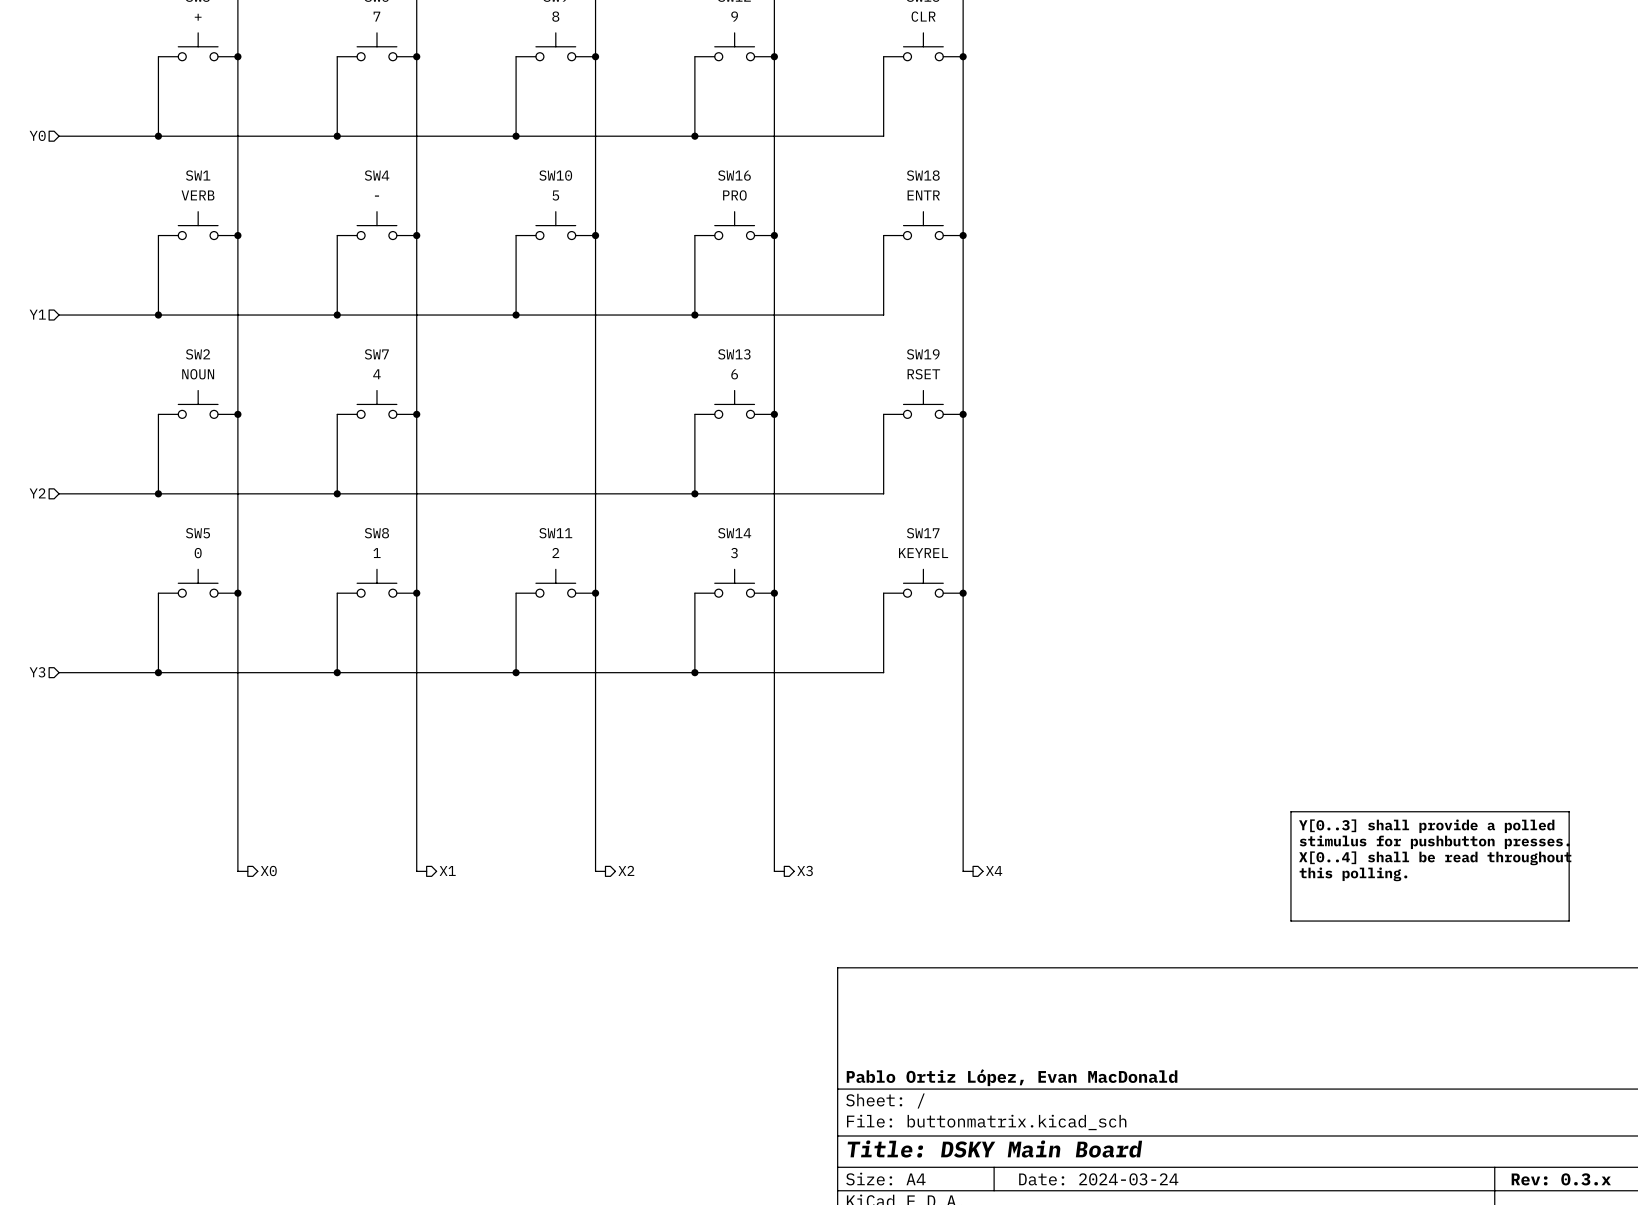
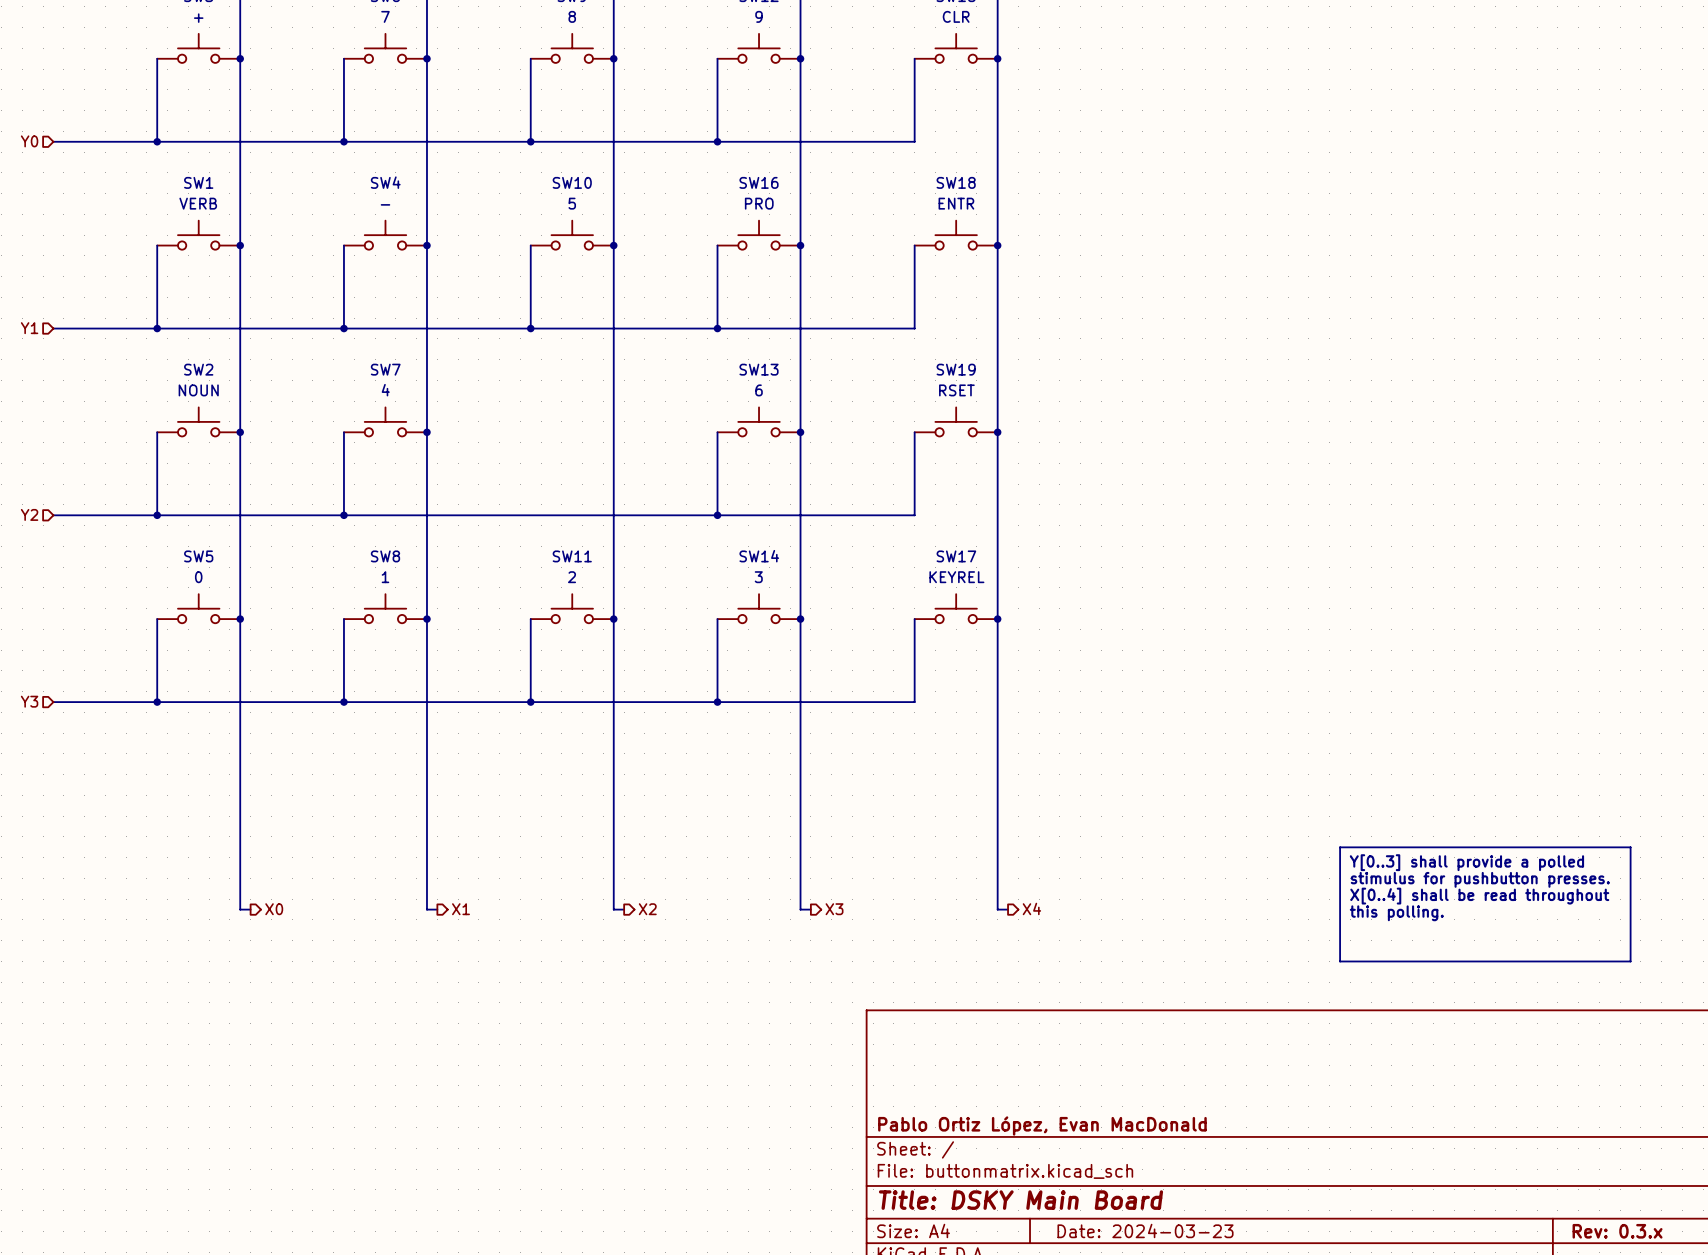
title block: Date: 2024-03-24 (1098, 1179) -> Date: 2024-03-23 (1145, 1230)

